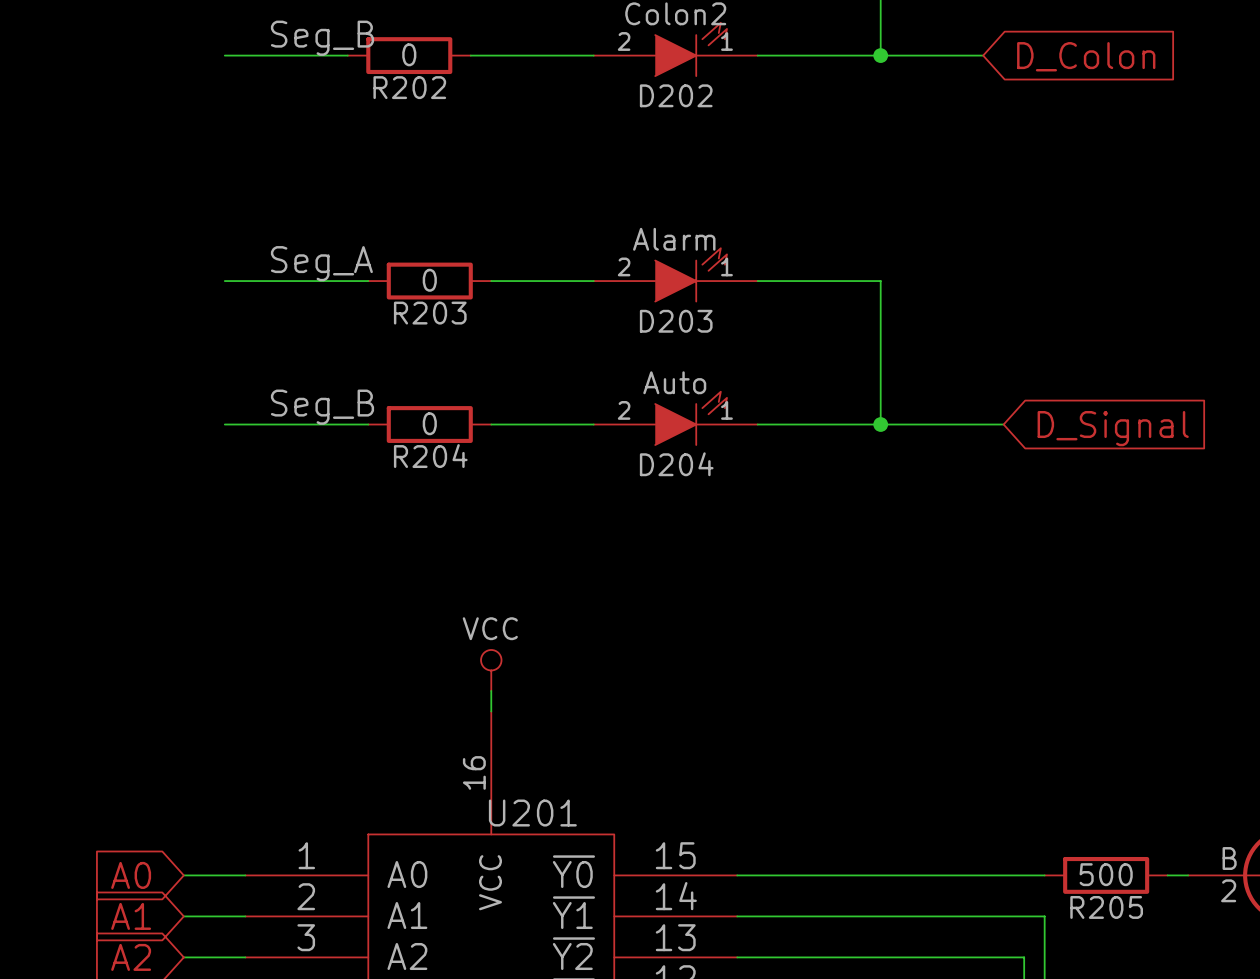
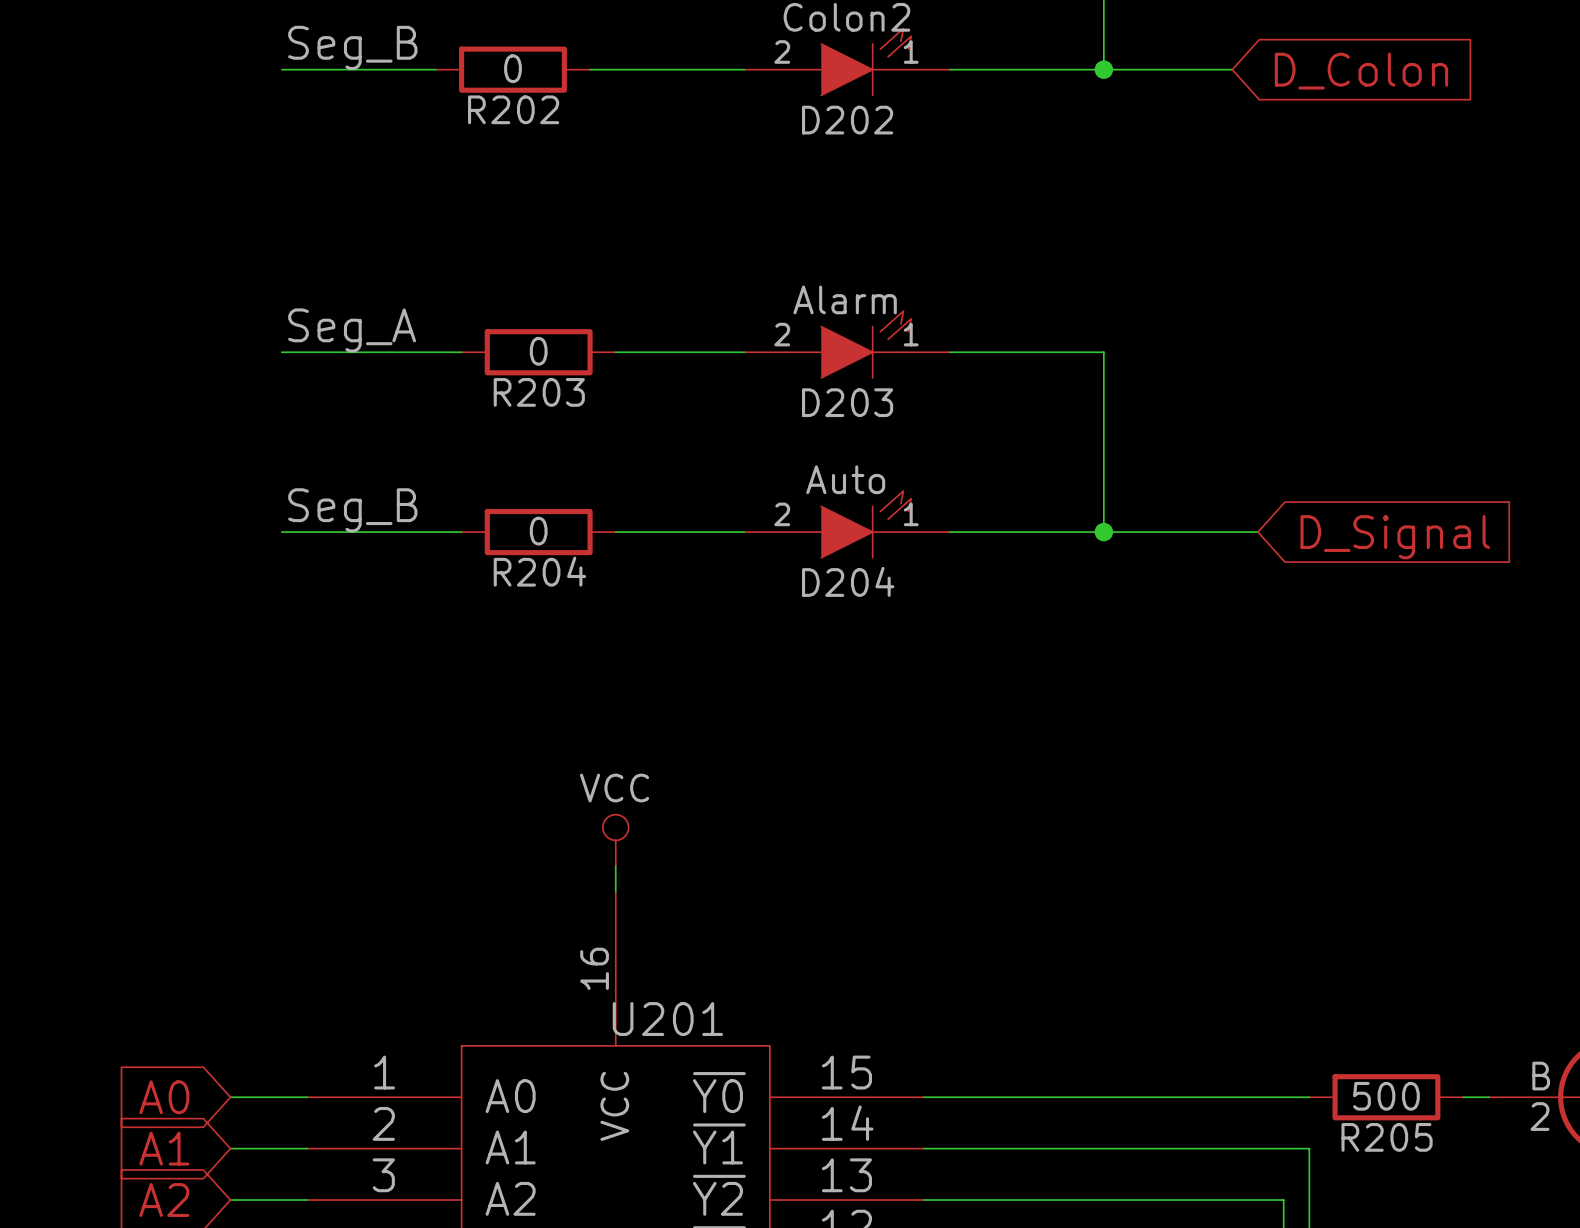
label position: Seg_B (322, 38) -> Seg_B (352, 47)
label position: Seg_A (321, 263) -> Seg_A (352, 330)
label position: Seg_B (322, 407) -> Seg_B (352, 510)

